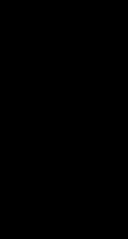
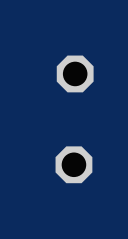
part: none -> (75, 73)
part: none -> (73, 164)

